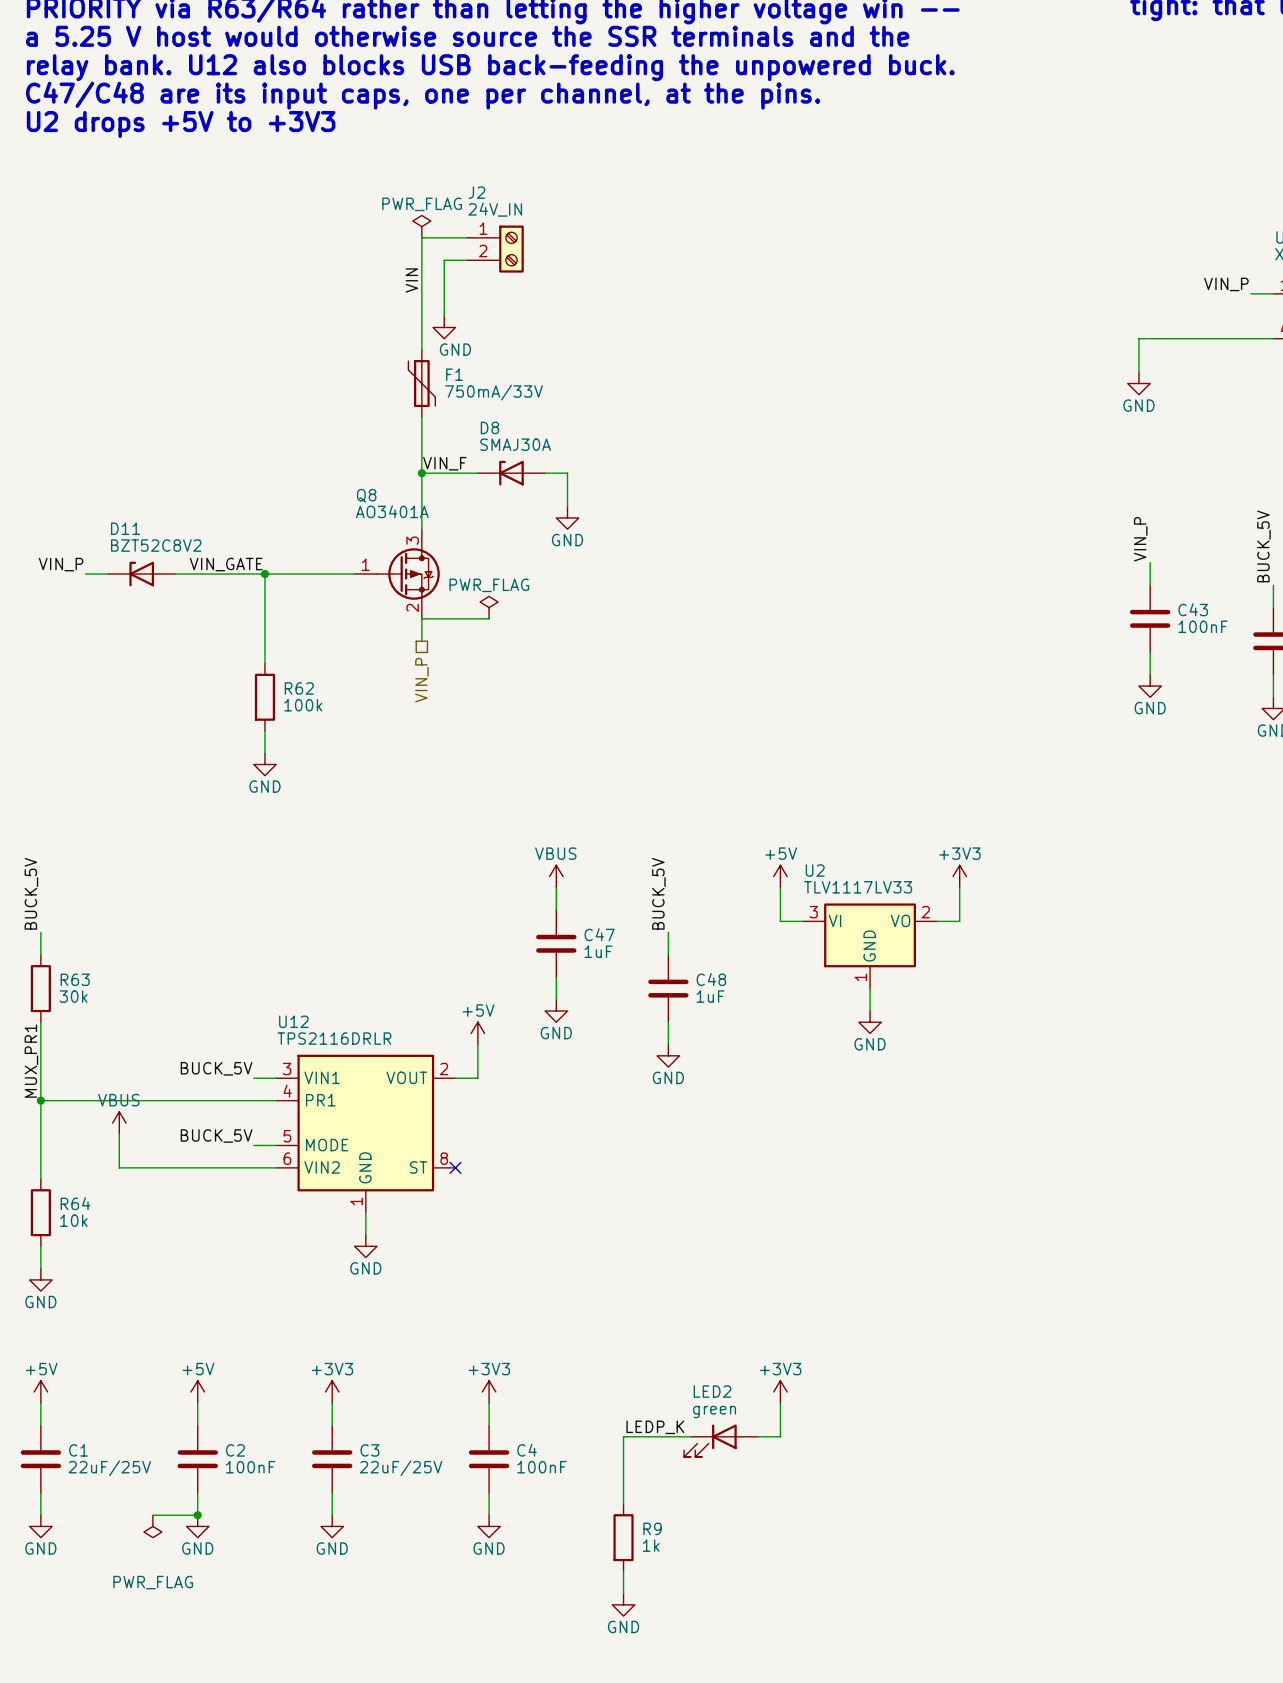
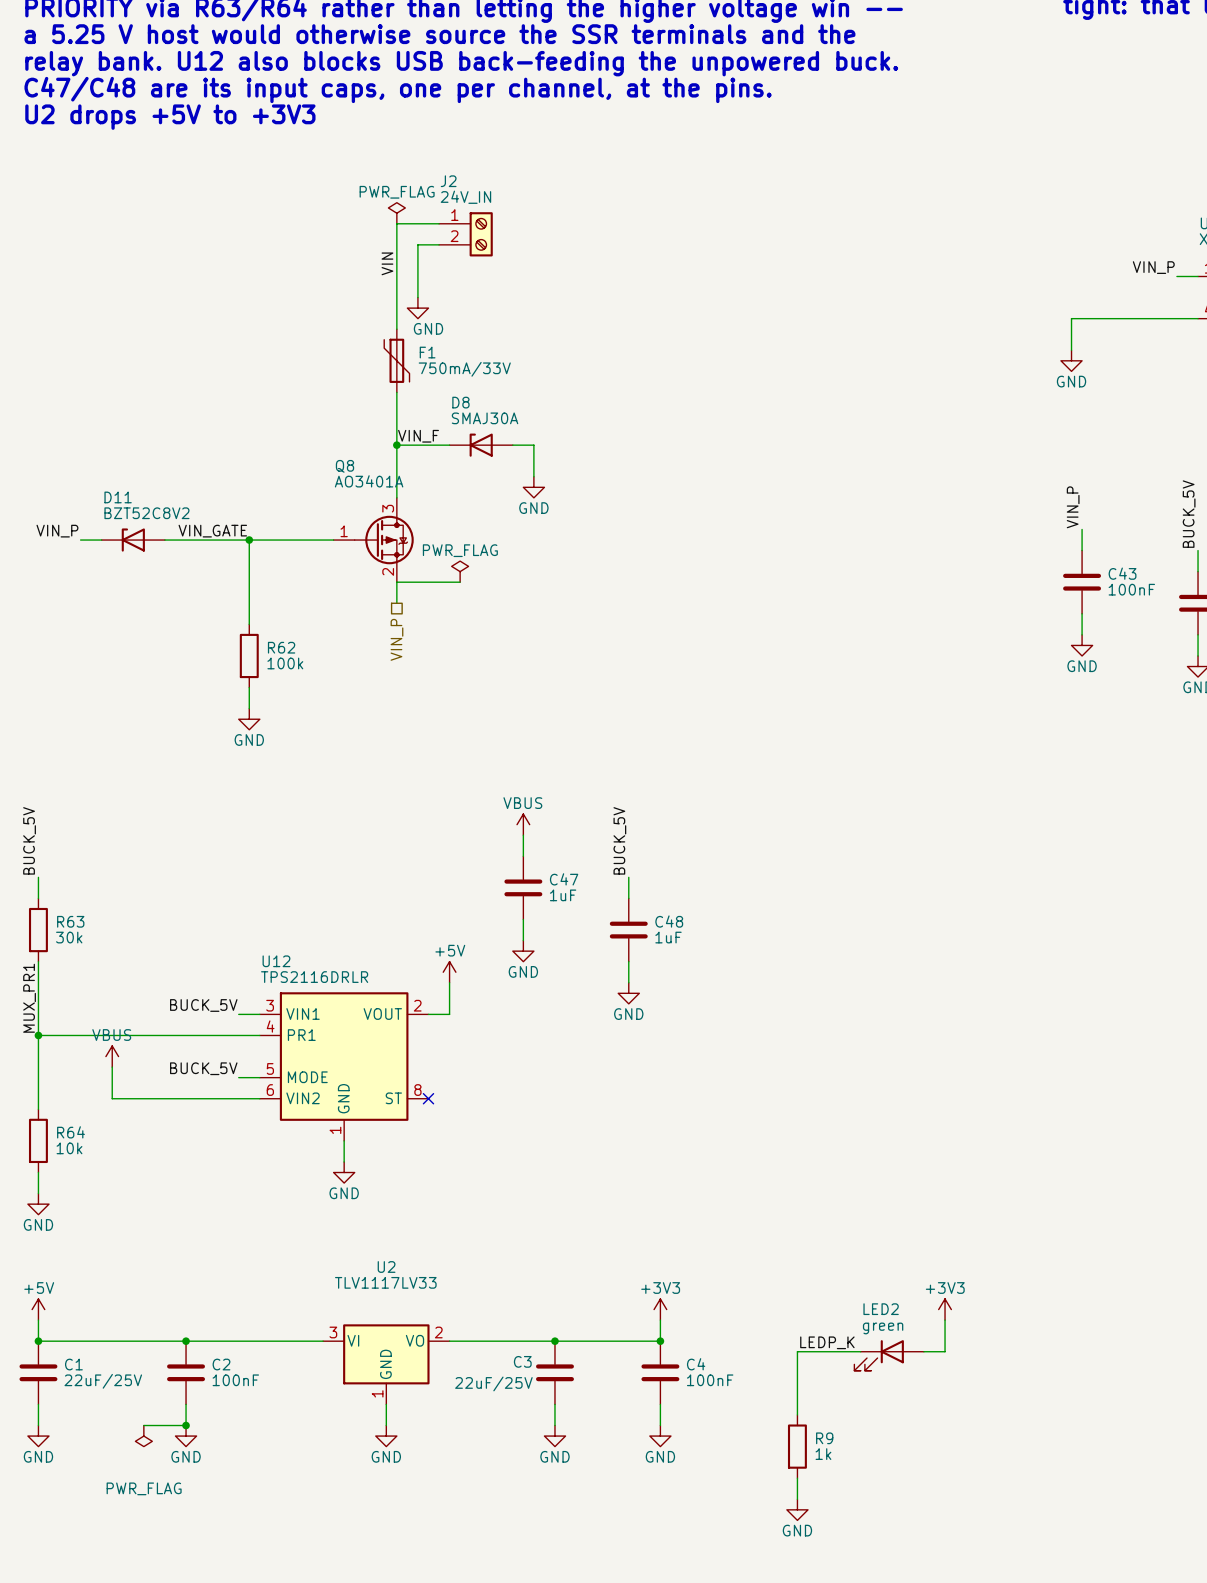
U2 name position: U2 (815, 870) -> U2 (386, 1267)
power symbol: +5V (780, 876) -> none
power symbol: +3V3 (959, 876) -> none
wire: (780, 887) (780, 921) (802, 921) -> none
U2 value position: TLV1117LV33 (858, 887) -> TLV1117LV33 (385, 1282)
wire: (959, 887) (959, 921) (937, 921) -> none
U2 position: (870, 946) -> (386, 1364)
wire: (870, 988) (870, 1011) -> none
power symbol: GND (870, 1022) -> none
power symbol: +5V (197, 1391) -> none
power symbol: +3V3 (332, 1391) -> none
power symbol: +3V3 (489, 1391) -> none
power symbol position: +3V3 (780, 1391) -> +3V3 (660, 1309)
power symbol: none -> +3V3 (945, 1309)
wire: (197, 1403) (197, 1425) -> none
wire: (332, 1403) (332, 1425) -> none
wire: (489, 1403) (489, 1425) -> none
wire: none -> (660, 1320) (660, 1341) (449, 1341)
wire: (780, 1403) (780, 1436) (757, 1436) -> none
wire: none -> (945, 1320) (945, 1351) (923, 1351)
wire: none -> (38, 1341) (323, 1341)
junction: none -> (38, 1341)
junction: none -> (186, 1341)
junction: none -> (554, 1341)
junction: none -> (660, 1341)
label: LEDP_K (655, 1427) -> none
label: none -> LEDP_K (827, 1342)
wire: (690, 1436) (623, 1436) (623, 1504) -> none
wire: none -> (860, 1351) (797, 1351) (797, 1414)
LED2 position: (721, 1440) -> (889, 1355)
C3 name position: C3 (369, 1450) -> C3 (522, 1361)
C3 position: (332, 1459) -> (554, 1372)
C4 position: (489, 1459) -> (660, 1372)
C3 value position: 22uF/25V (401, 1468) -> 22uF/25V (493, 1383)
wire: (332, 1492) (332, 1515) -> none
wire: (489, 1492) (489, 1515) -> (386, 1404) (386, 1425)
wire: none -> (660, 1404) (660, 1425)
power symbol: GND (332, 1526) -> none
power symbol: none -> GND (386, 1436)
power symbol: GND (489, 1526) -> none
power symbol: none -> GND (554, 1436)
power symbol: none -> GND (660, 1436)
R9 position: (623, 1537) -> (797, 1446)
wire: (623, 1571) (623, 1593) -> (554, 1404) (554, 1425)
wire: none -> (797, 1478) (797, 1499)
power symbol: GND (623, 1604) -> none
power symbol: none -> GND (797, 1509)

